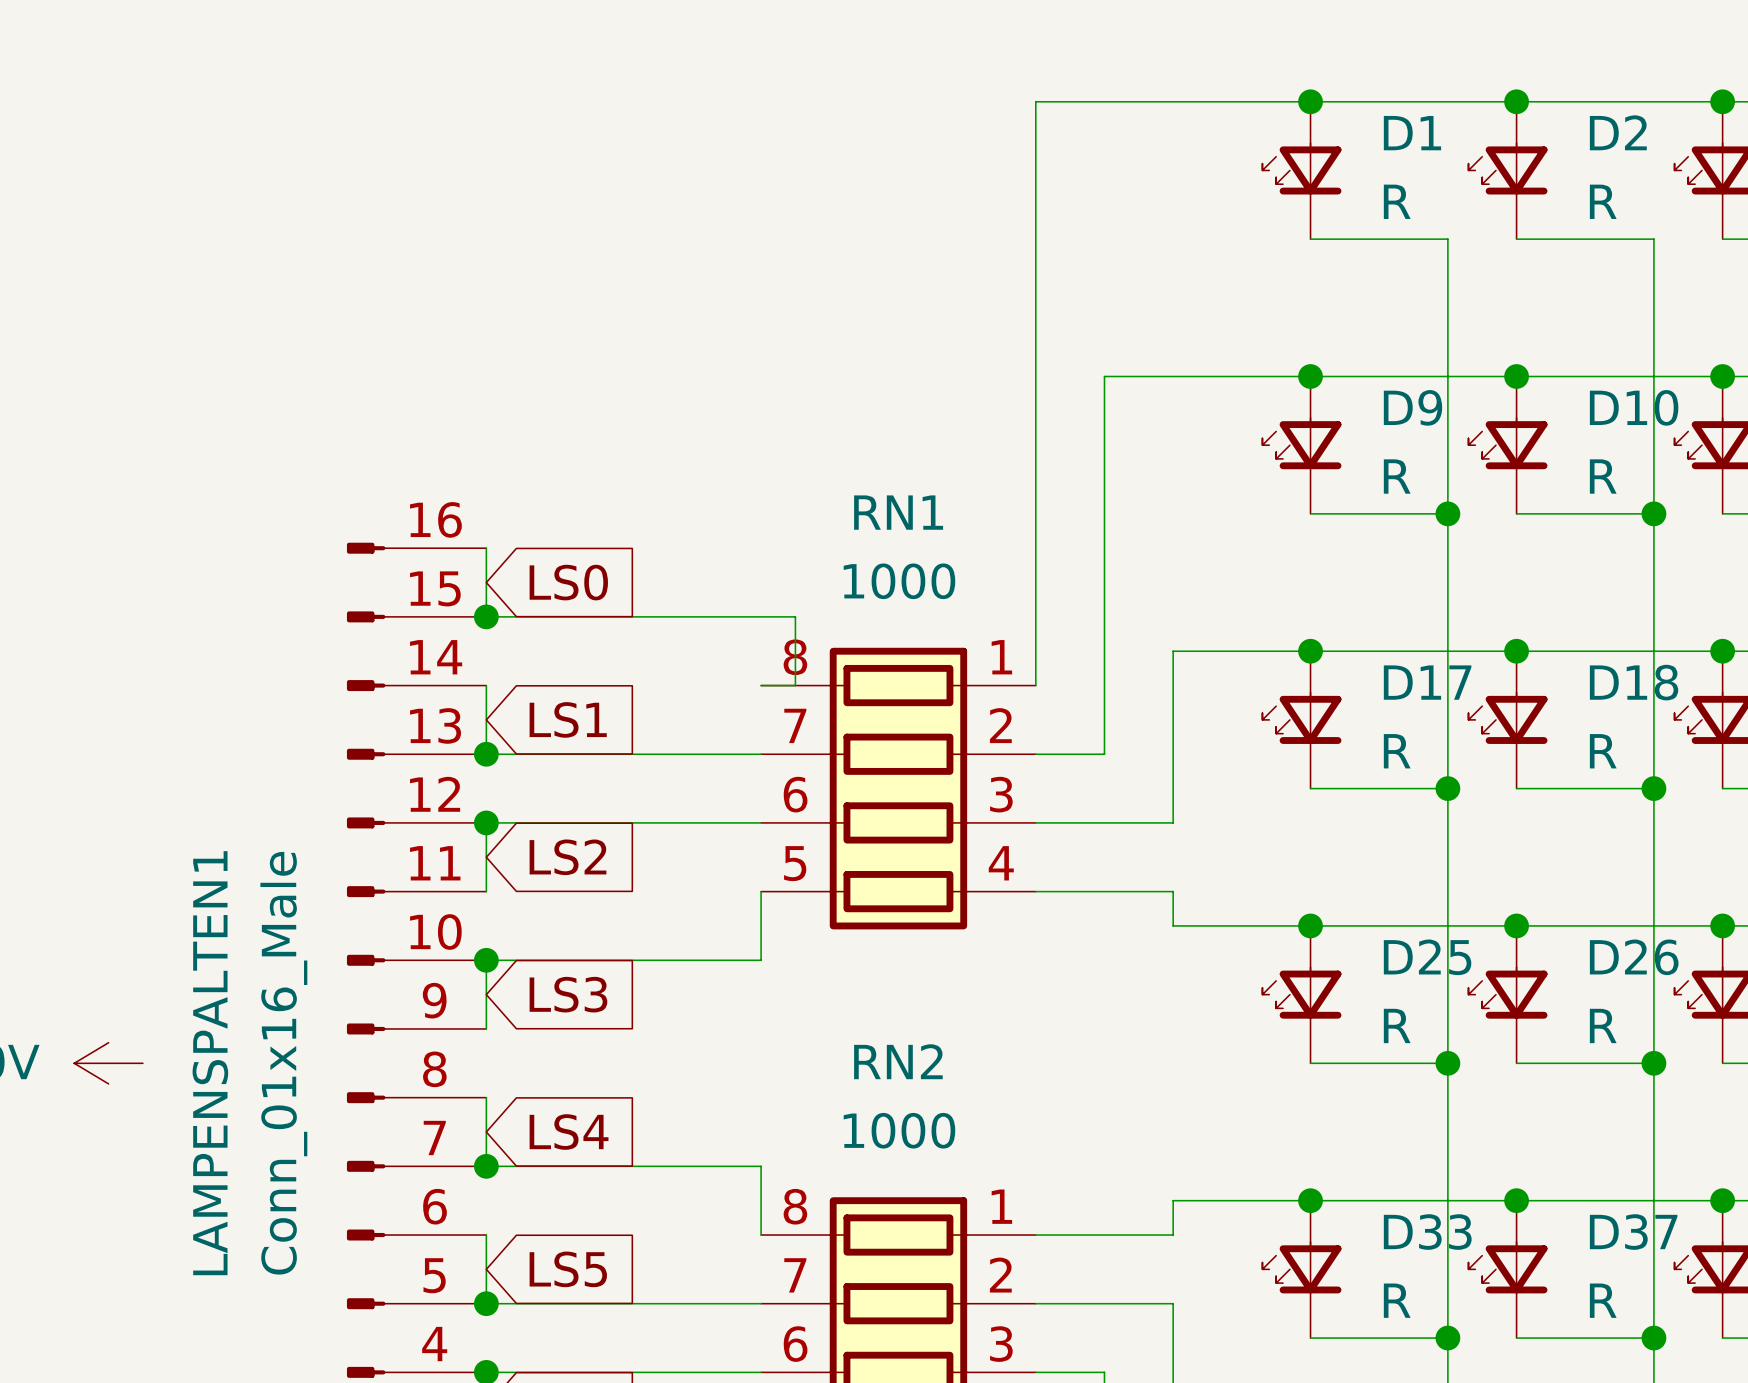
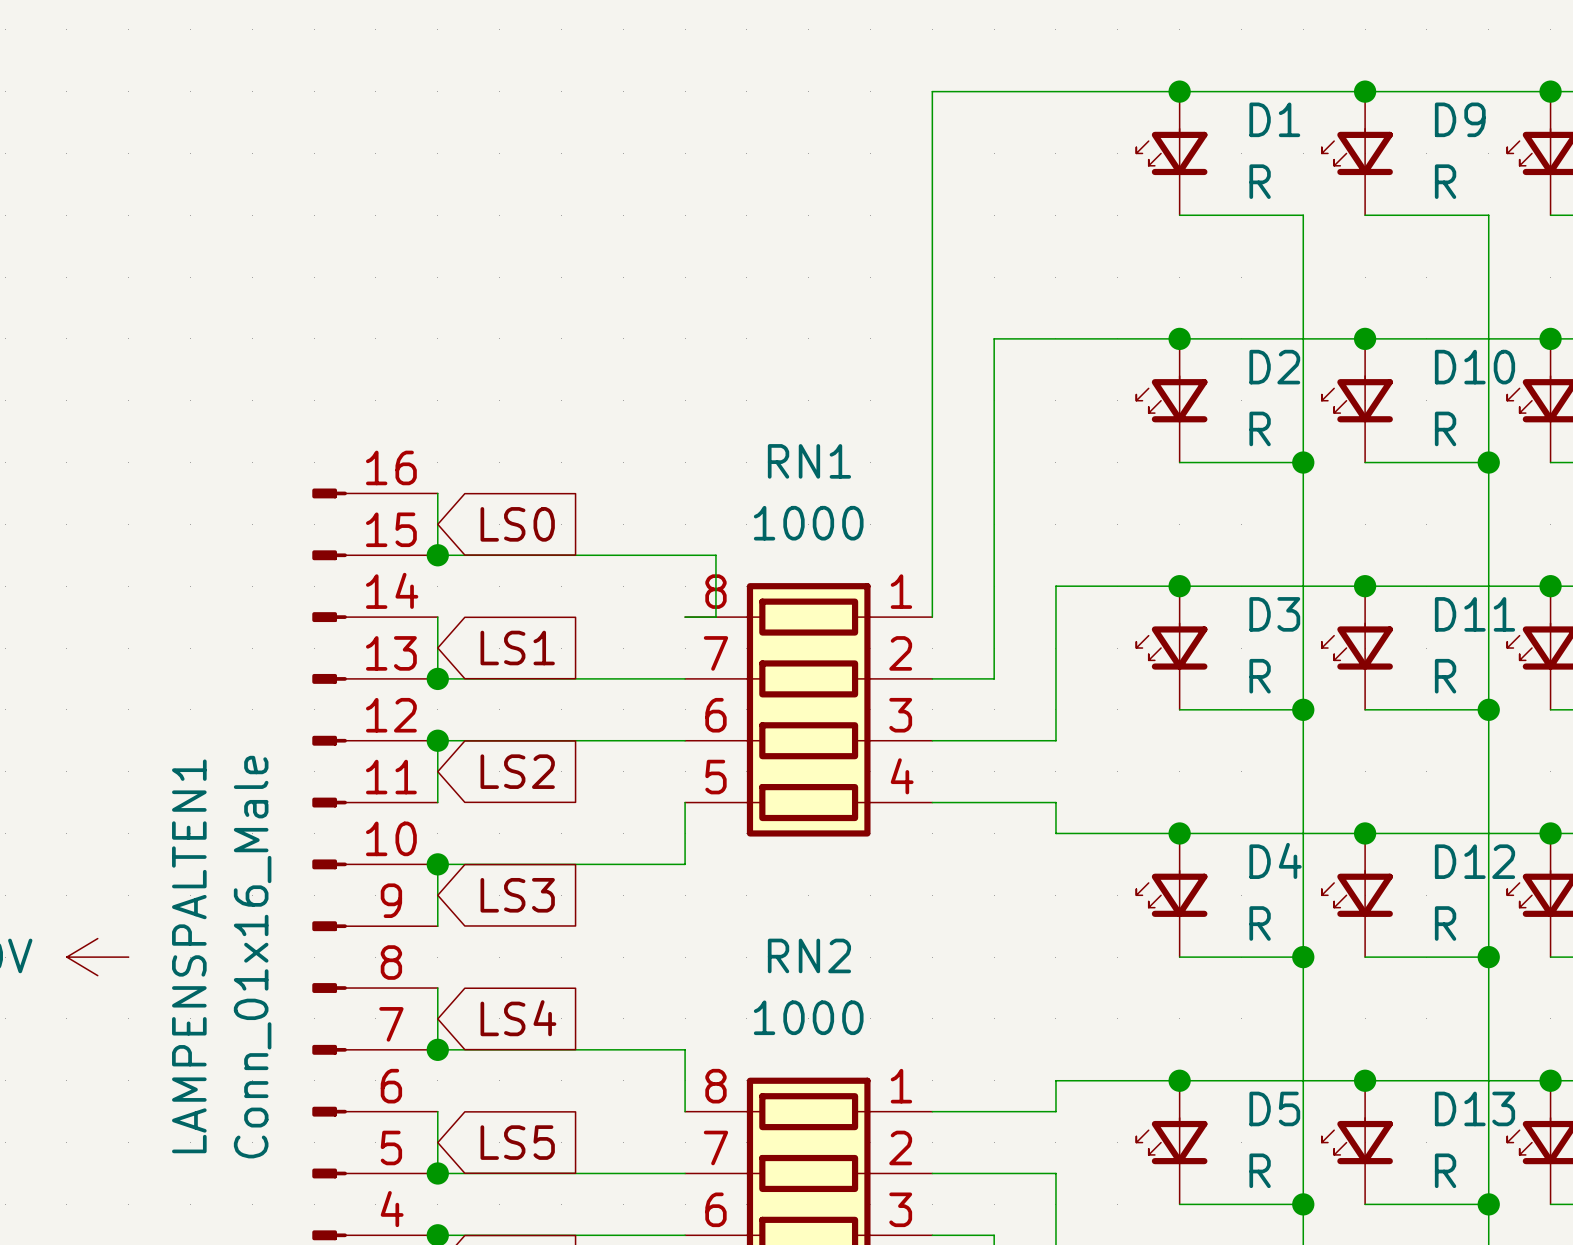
D2 name: D2 (1618, 132) -> D9 (1460, 119)
D9 name: D9 (1412, 407) -> D2 (1274, 367)
D17 name: D17 (1427, 682) -> D3 (1274, 614)
D18 name: D18 (1634, 682) -> D11 (1474, 614)
D25 name: D25 (1427, 957) -> D4 (1275, 860)
D26 name: D26 (1634, 957) -> D12 (1474, 861)
D33 name: D33 (1427, 1232) -> D5 (1274, 1108)
D37 name: D37 (1633, 1232) -> D13 (1474, 1108)

